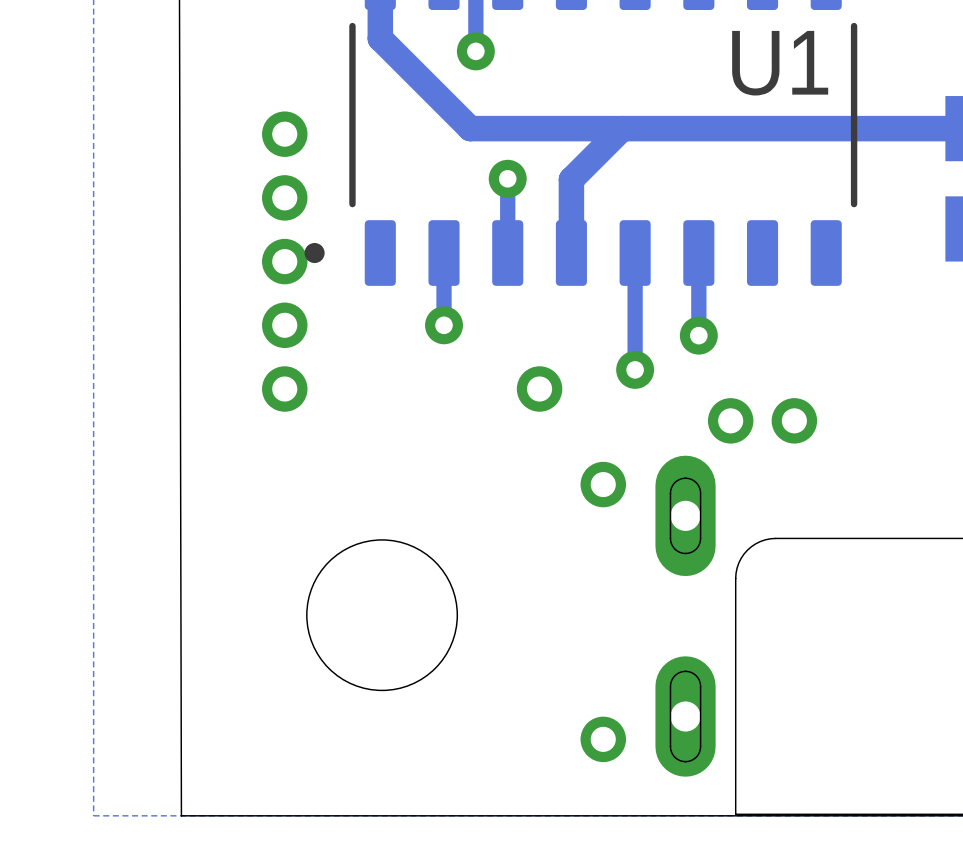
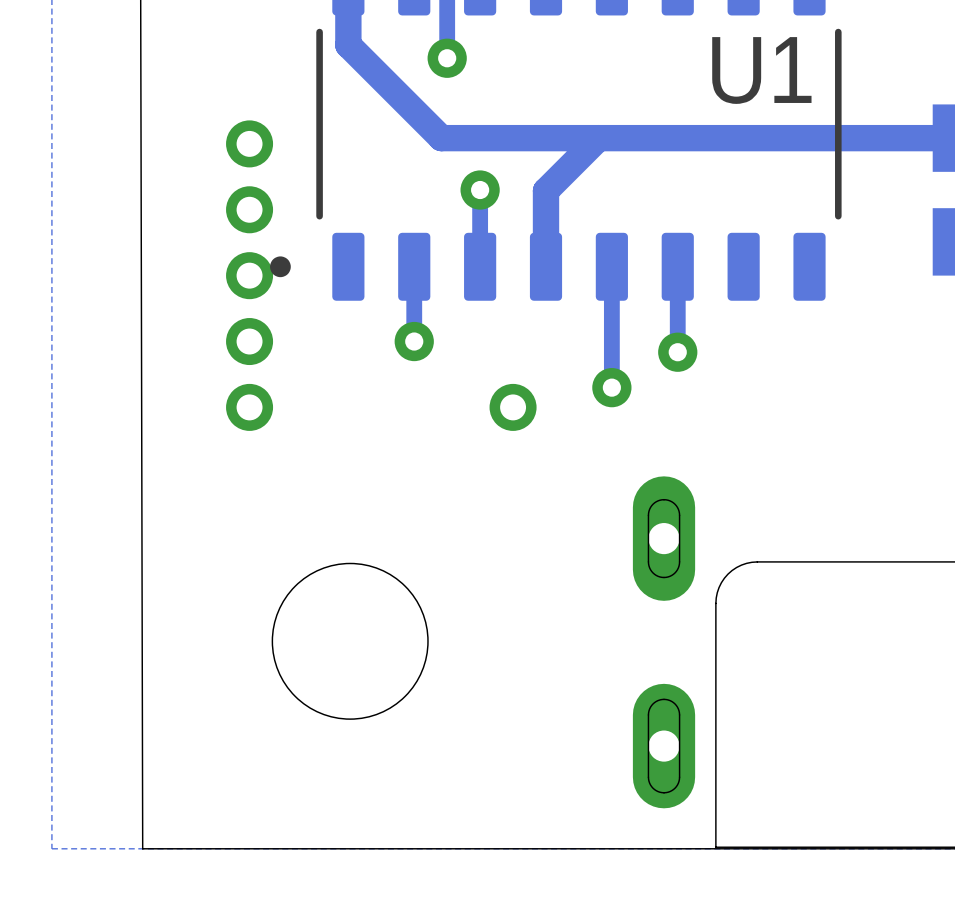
via: (730, 420) -> none
via: (794, 420) -> none
via: (603, 484) -> none
via: (603, 739) -> none

